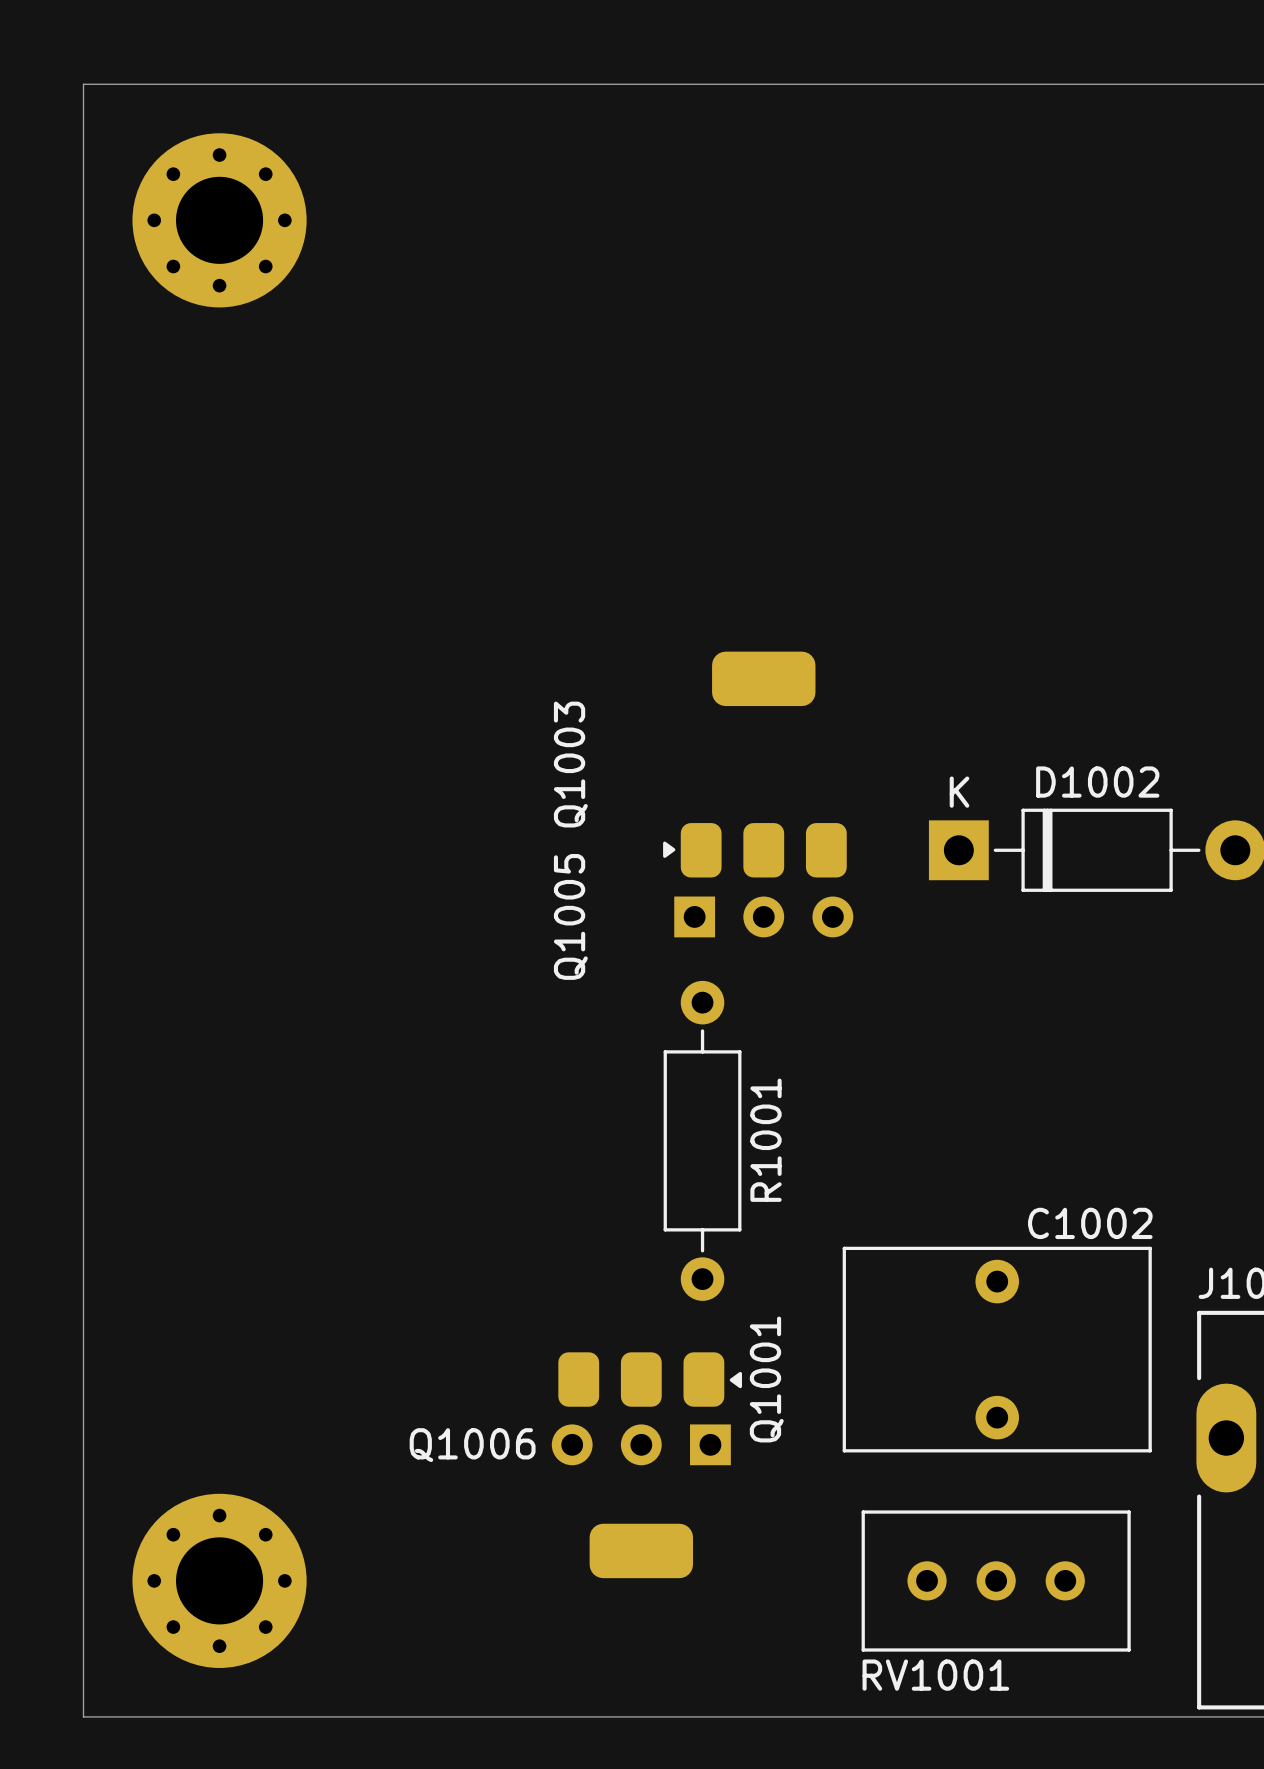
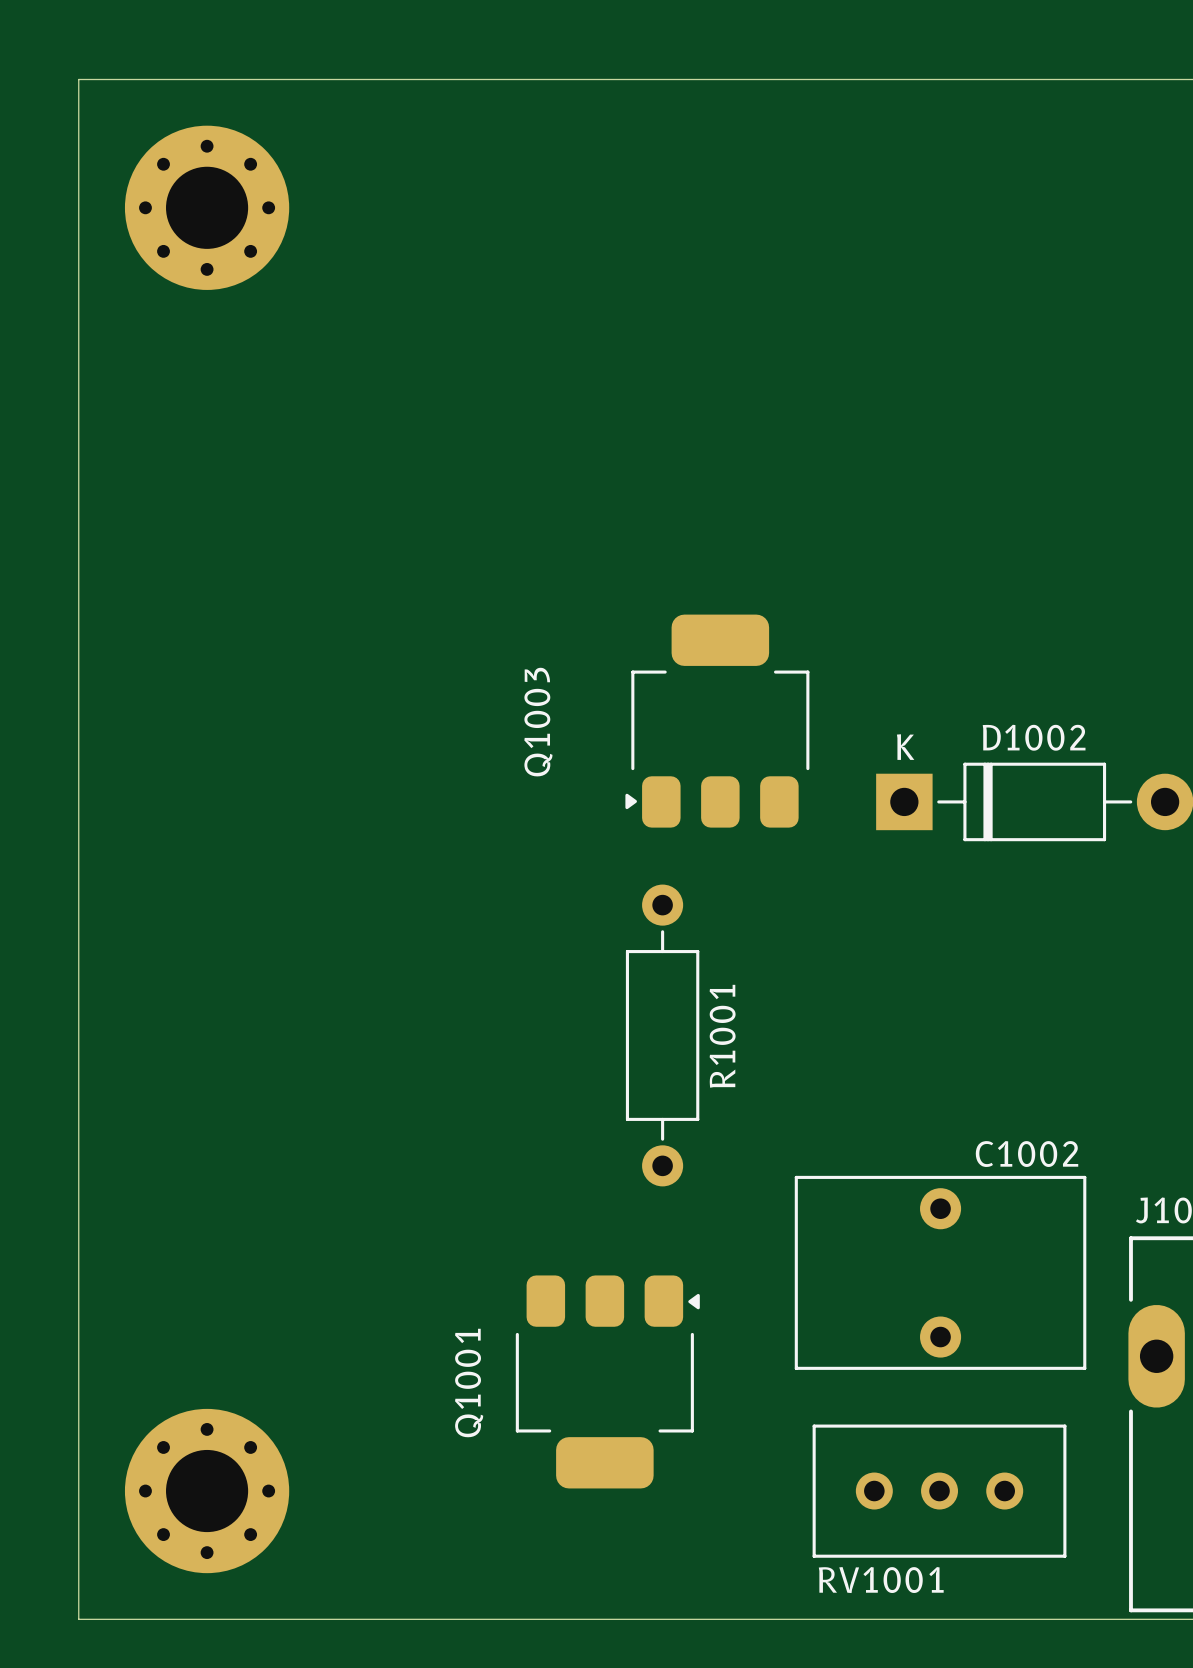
Q1003 footprint: [663, 651, 847, 878] -> [625, 614, 810, 828]
Q1005: (763, 916) -> none
R1001 position: (702, 1140) -> (662, 1035)
Q1001 footprint: [558, 1352, 743, 1579] -> [515, 1275, 700, 1489]
Q1001 name position: Q1001 (766, 1379) -> Q1001 (469, 1383)
Q1006: (641, 1444) -> none

